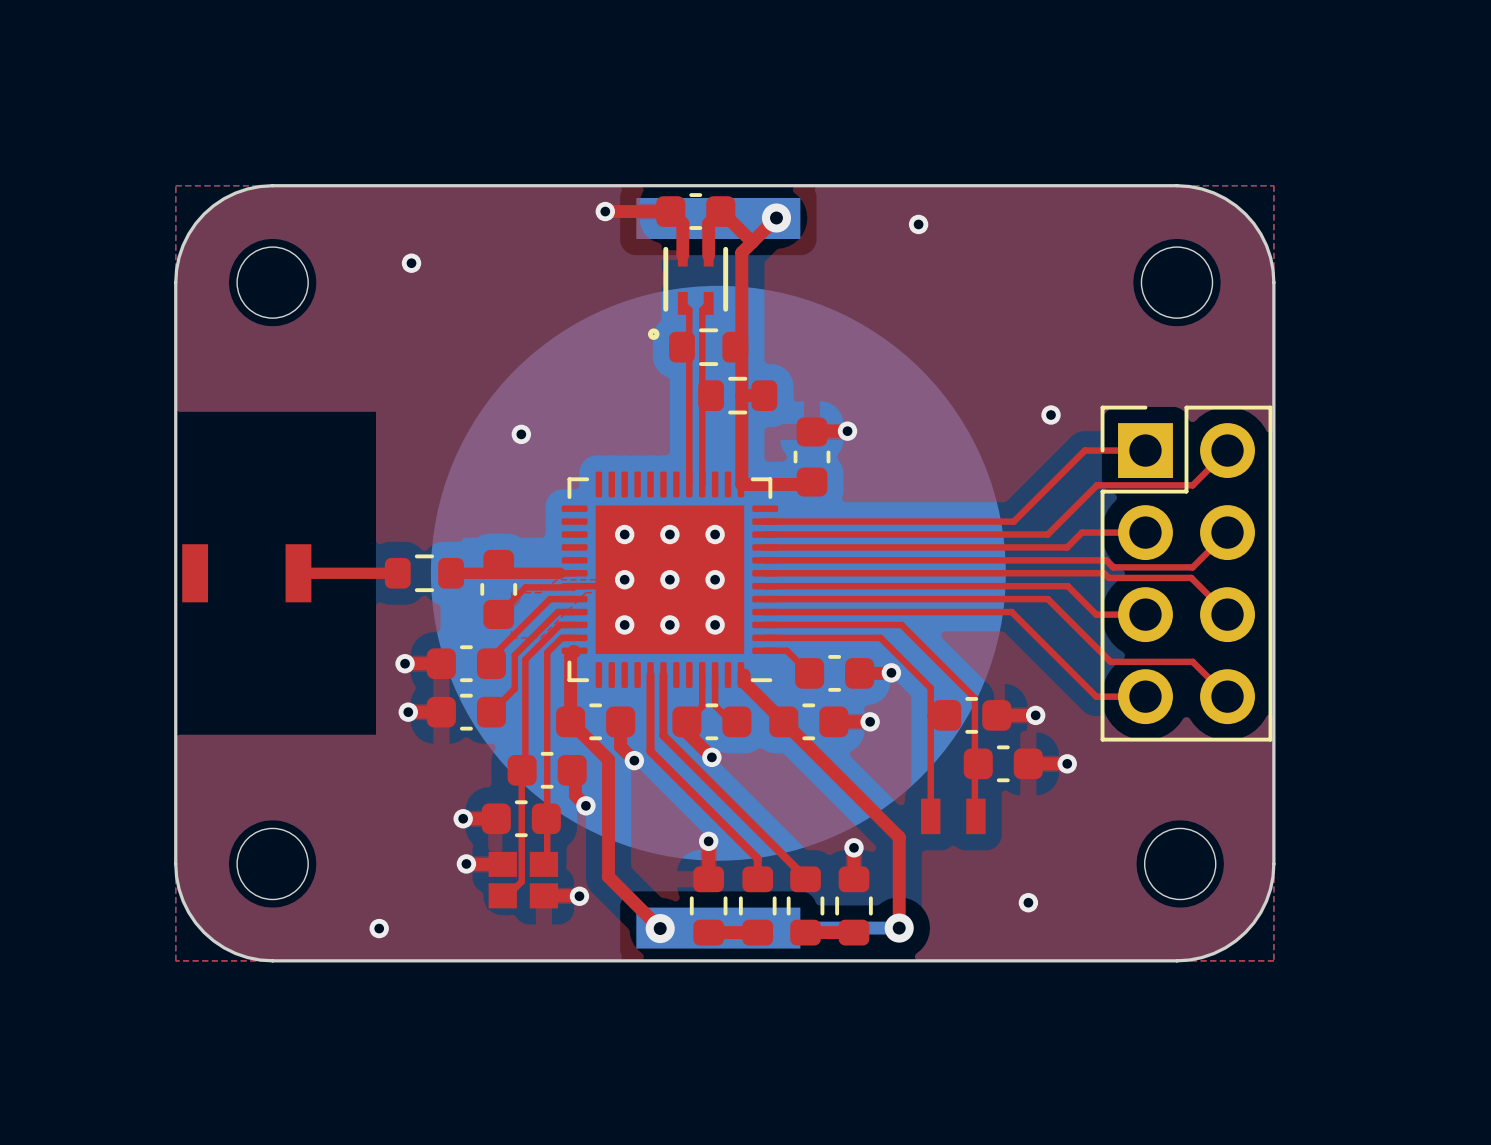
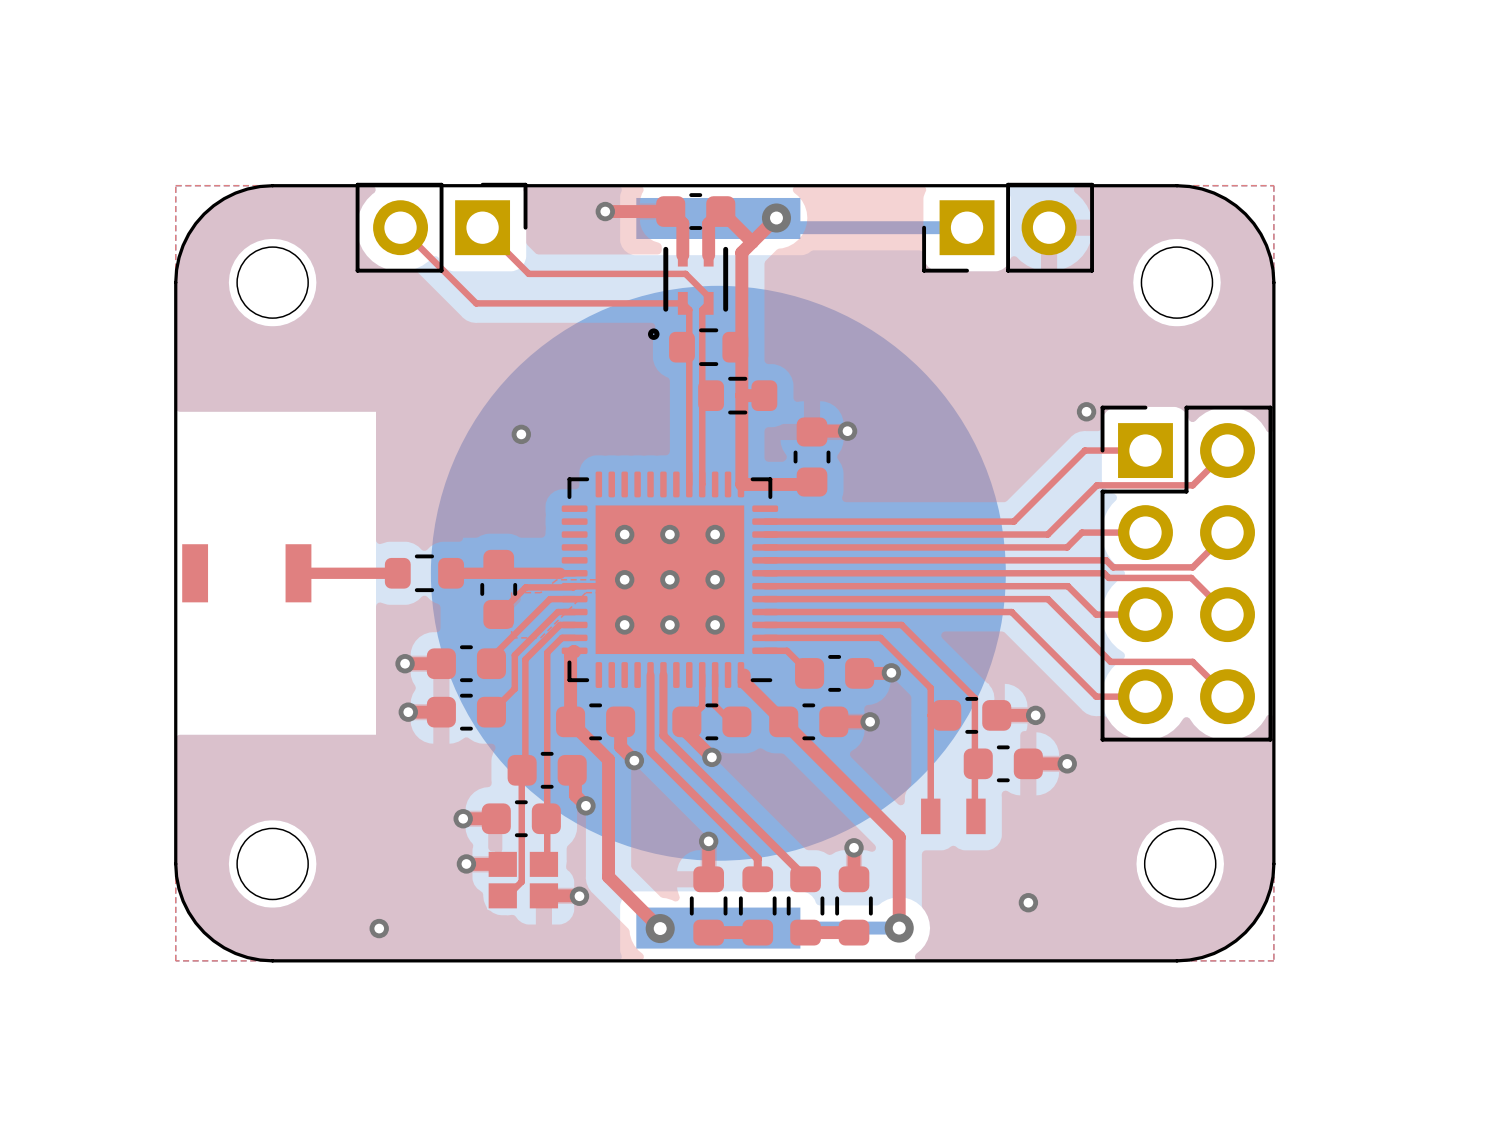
bottom track: none -> (718, 218) (727, 227) (967, 227)
via: (918, 224) -> none
top track: none -> (400, 227) (476, 303) (682, 303)
part: none -> (441, 227)
top track: none -> (482, 227) (528, 273) (685, 273) (708, 296) (708, 303)
part: none -> (1008, 227)
via: (411, 263) -> none
via position: (1051, 415) -> (1086, 411)

